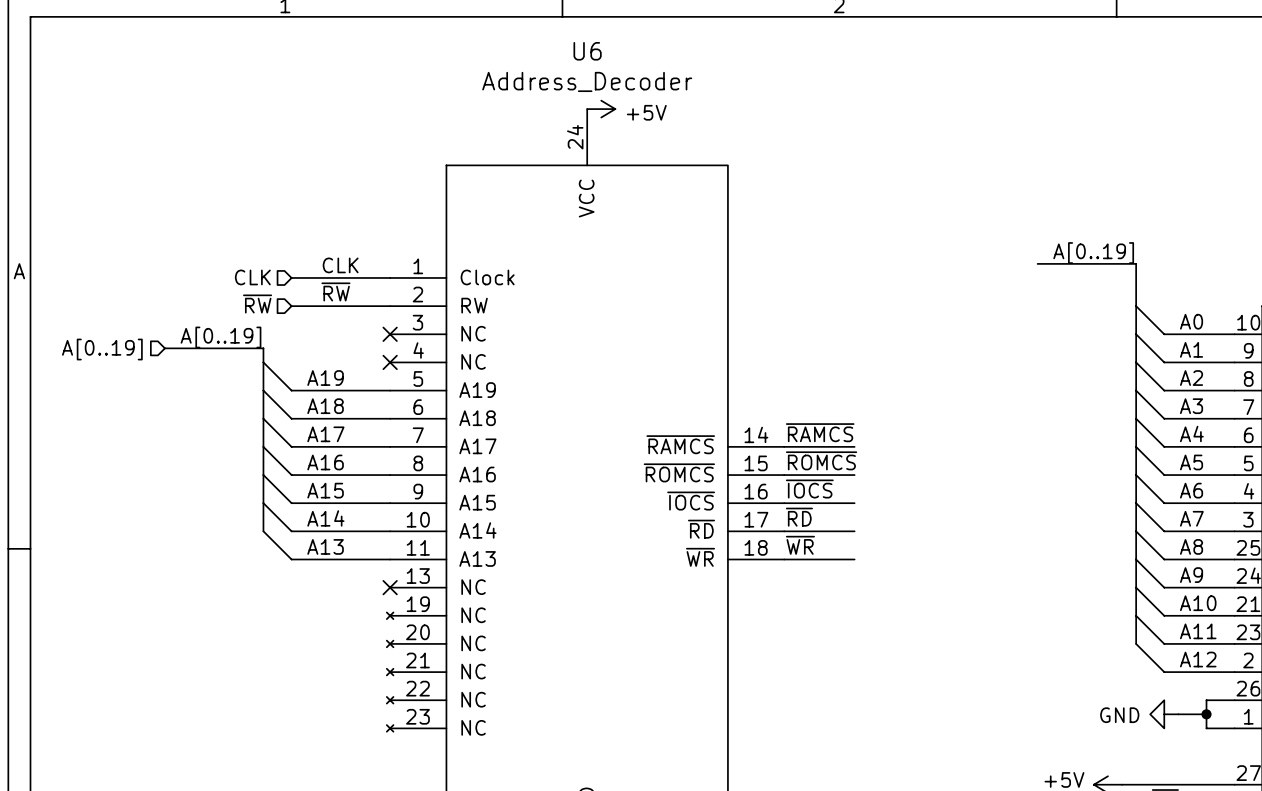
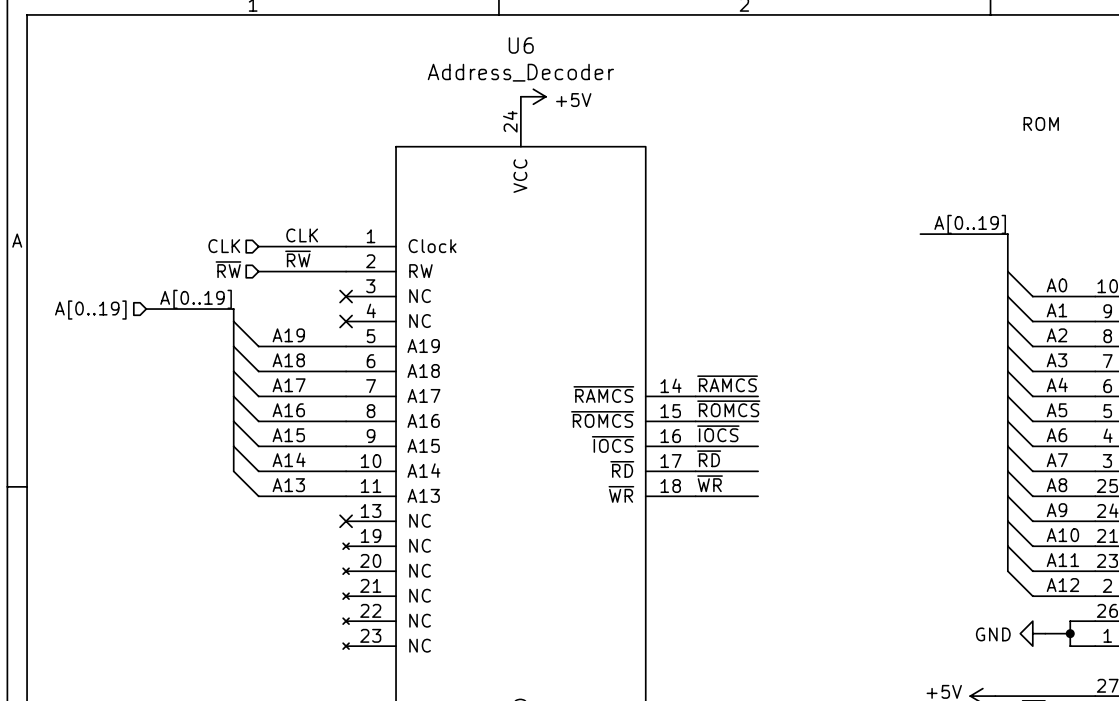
text: none -> ROM (1041, 123)

